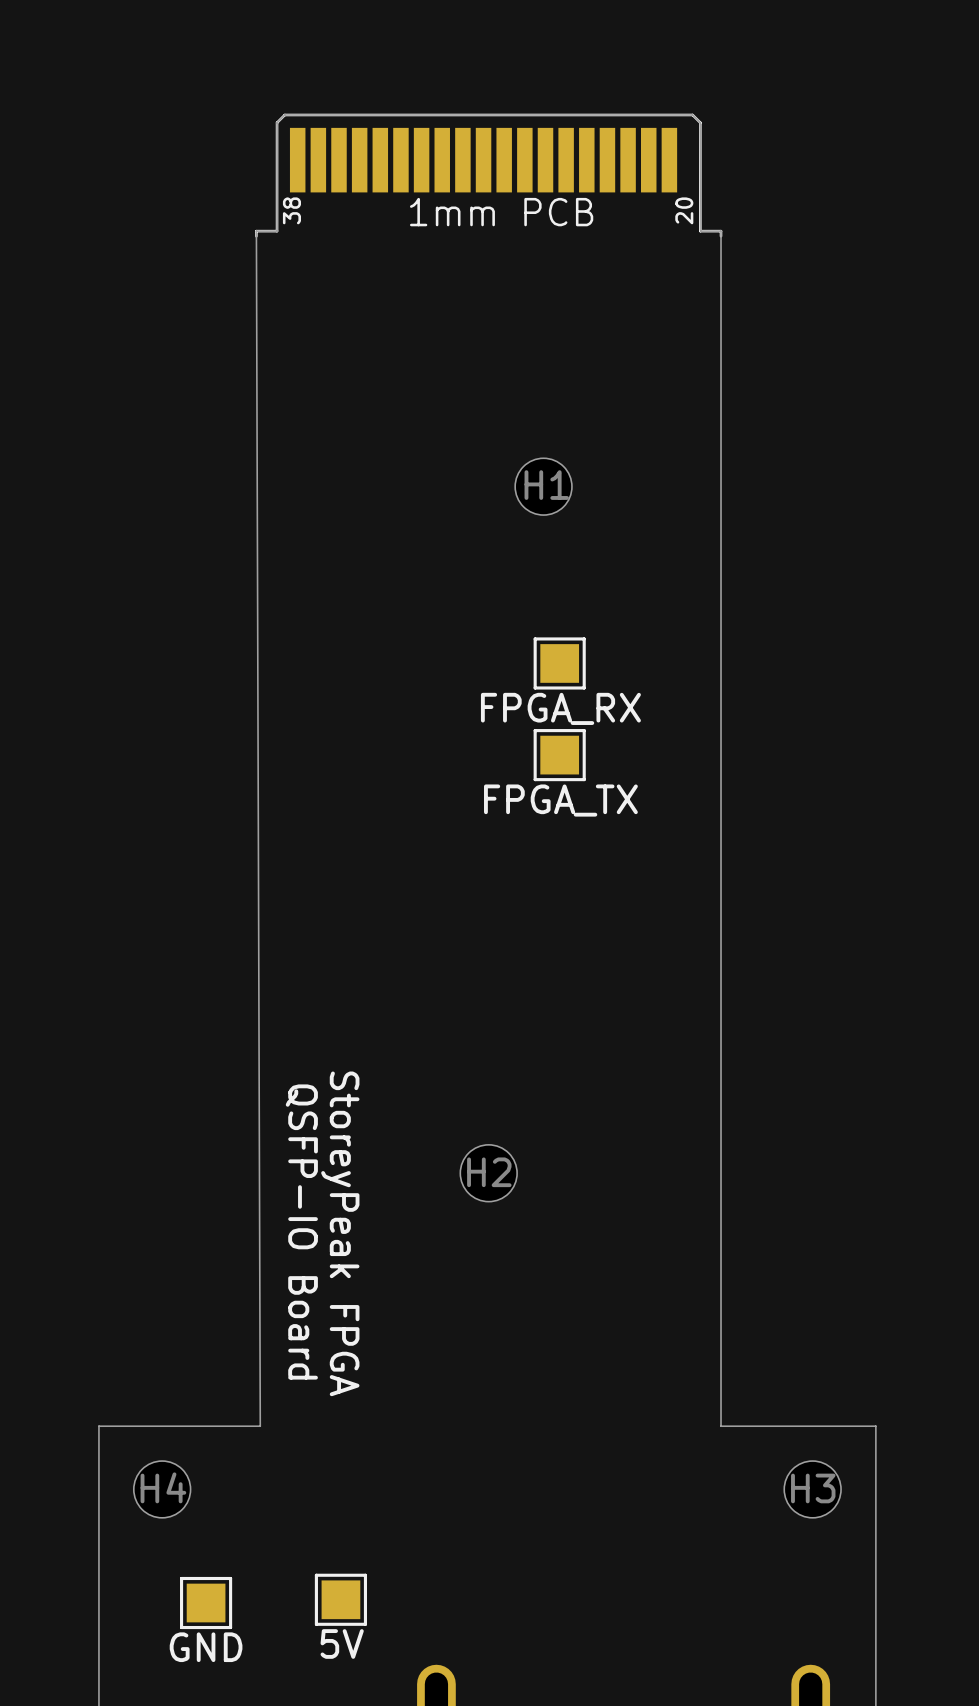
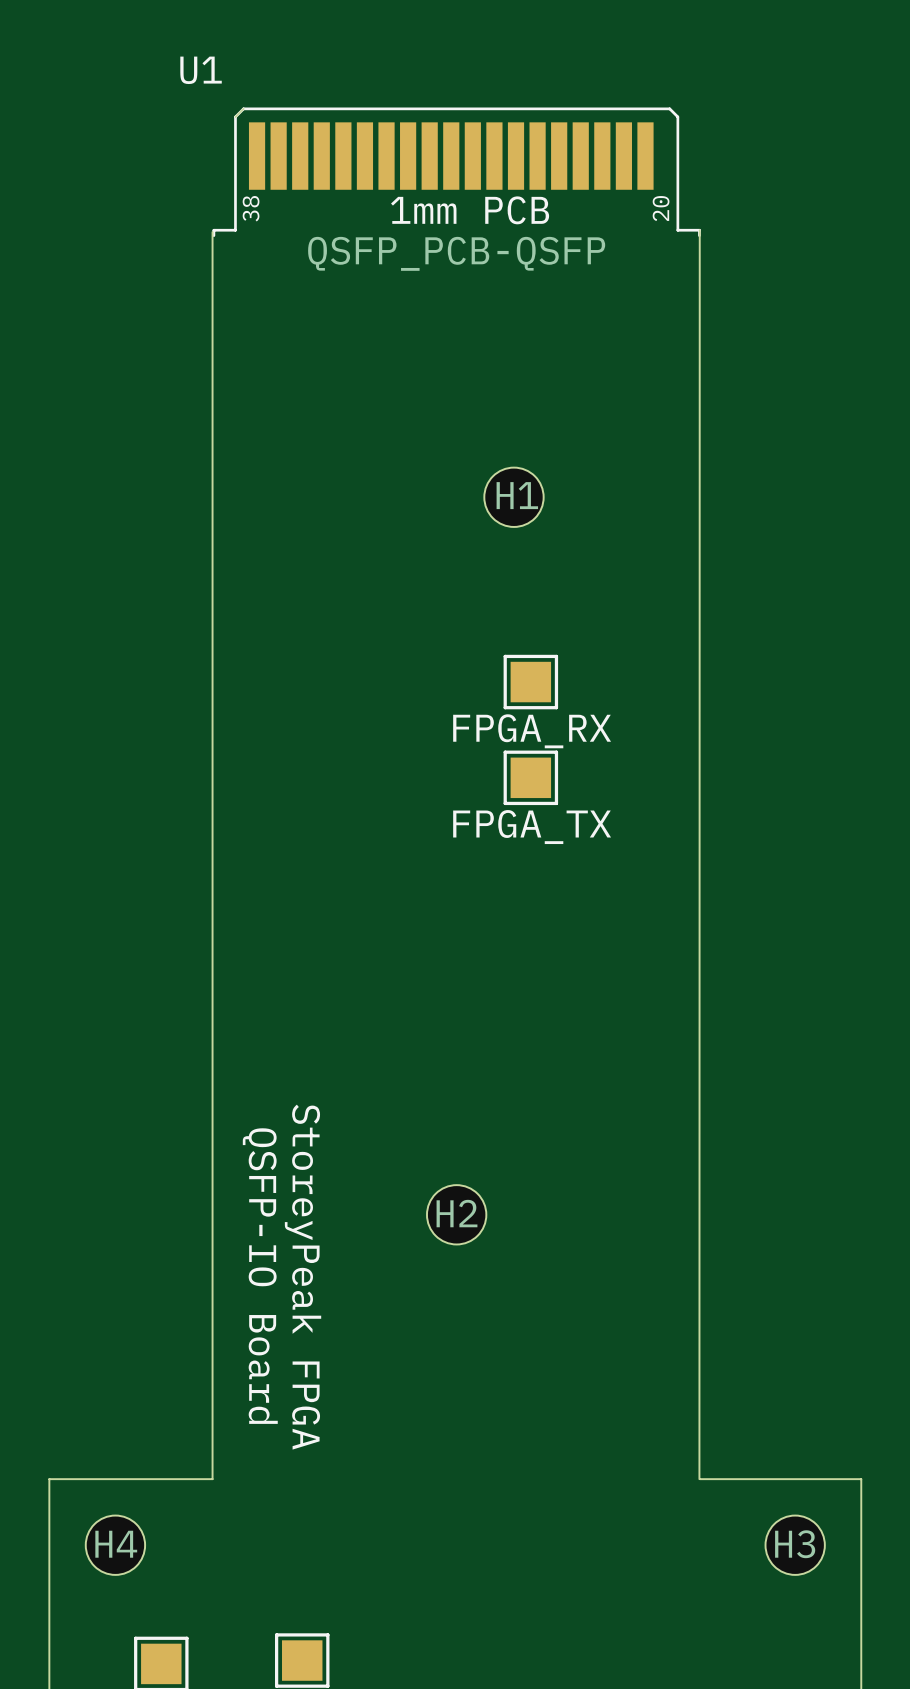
U1 name: none -> U1 (201, 70)
board edge: (284, 114) (692, 114) (700, 122) (701, 231) (721, 231) (721, 1426) -> (699, 230) (699, 1479)
board edge: (277, 122) (277, 231) (256, 231) (260, 1426) (255, 1426) -> (212, 232) (212, 1479)
U1 value: none -> QSFP_PCB-QSFP (456, 253)

